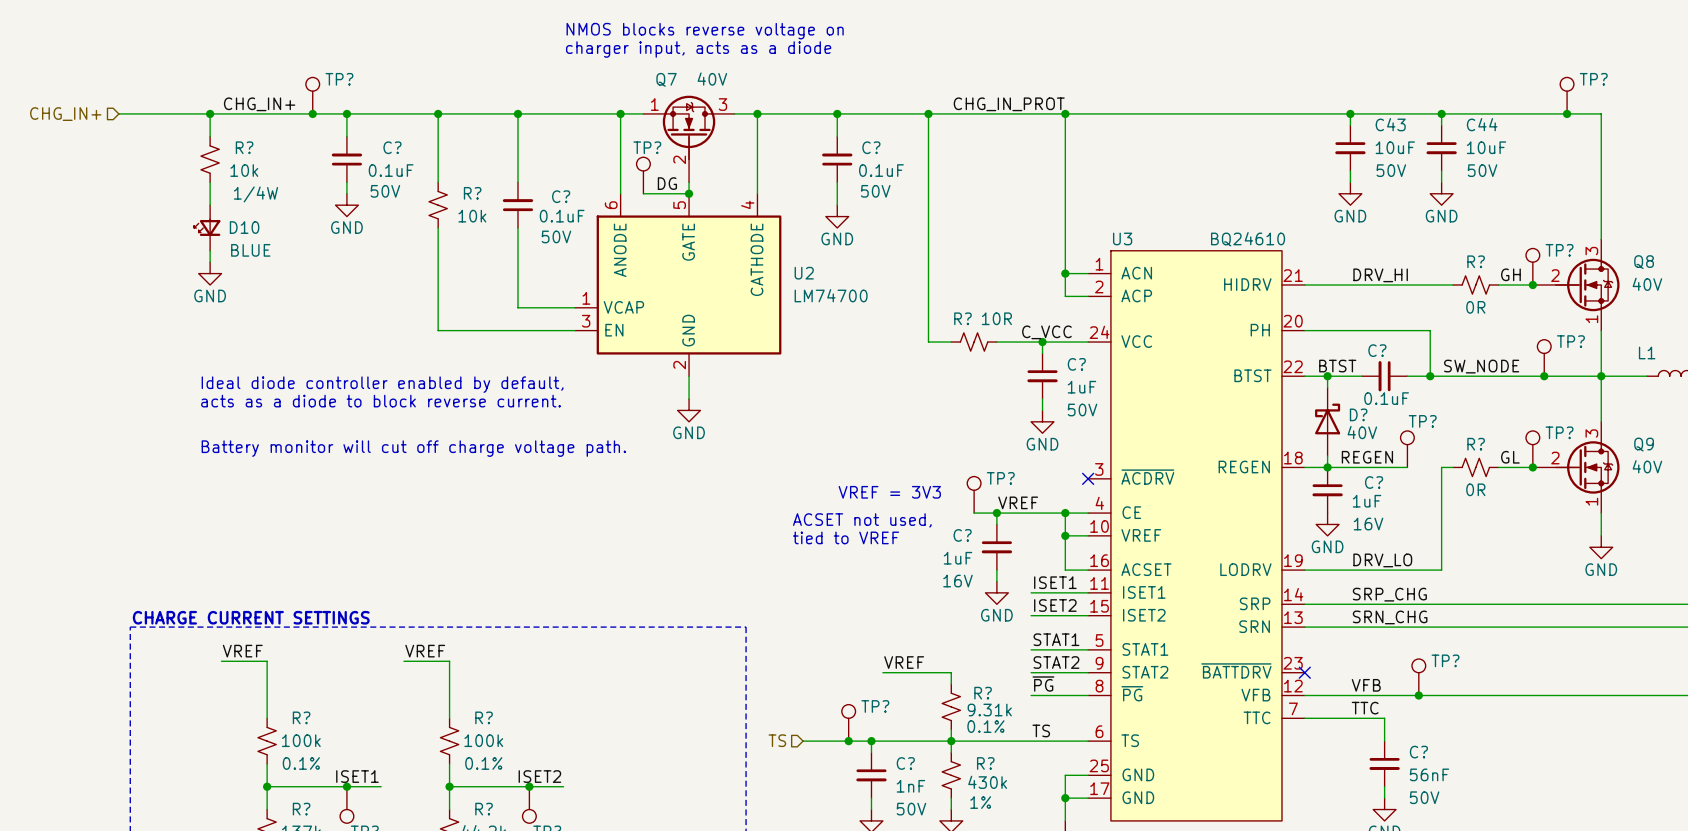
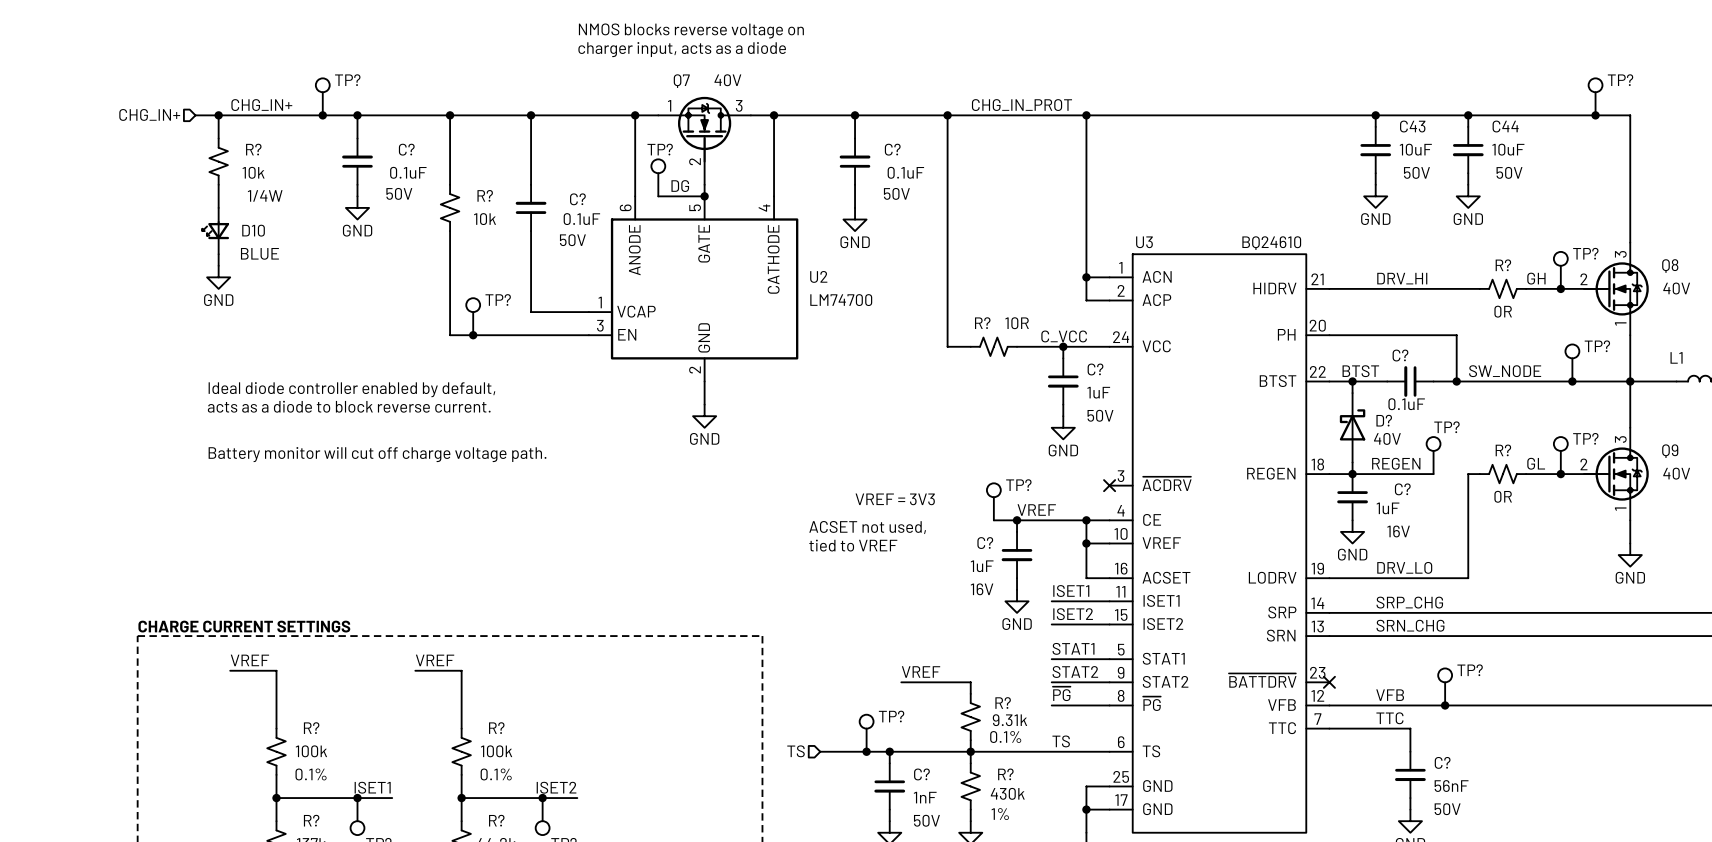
wire: (118, 113) (187, 113) -> none
hierarchical label position: CHG_IN+ (65, 114) -> CHG_IN+ (149, 114)
TP?: none -> (473, 316)
junction: none -> (473, 335)

